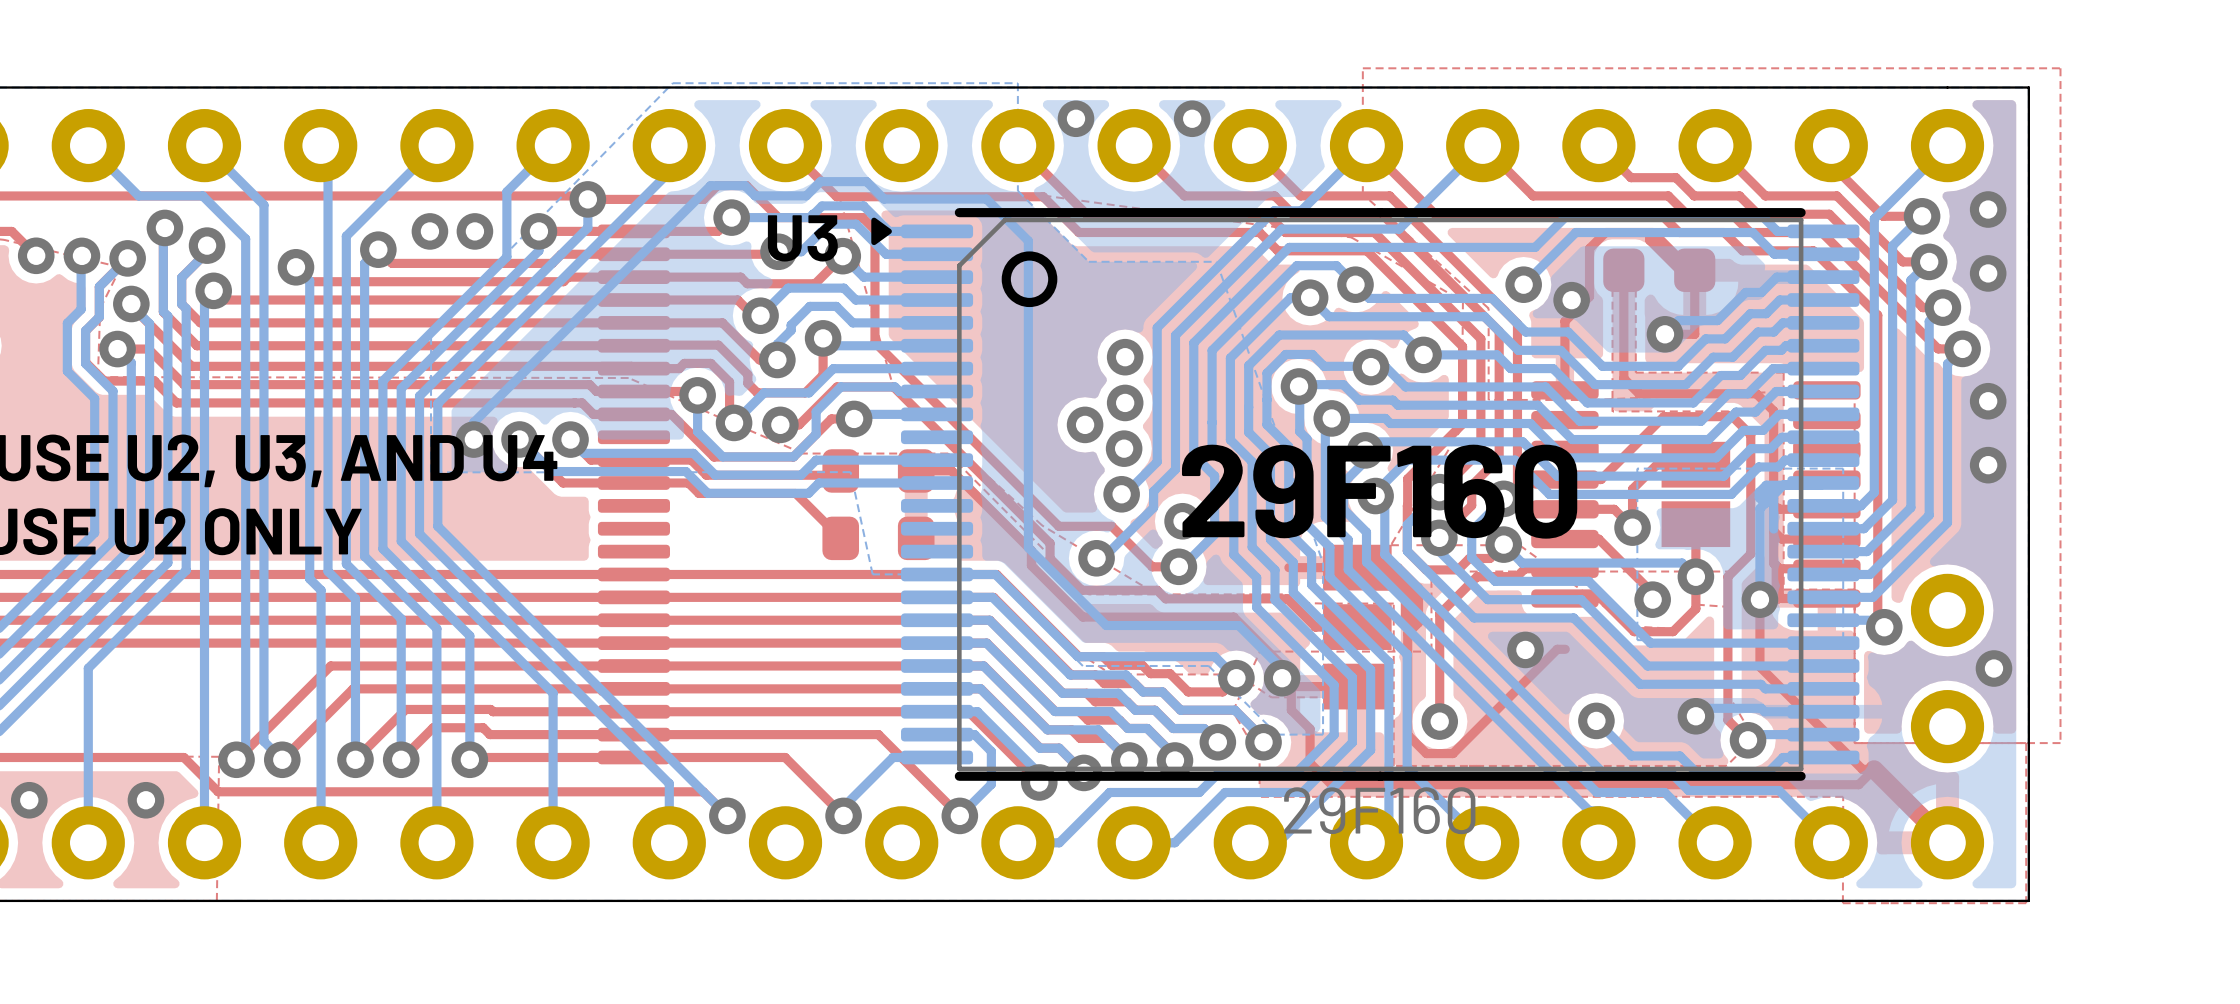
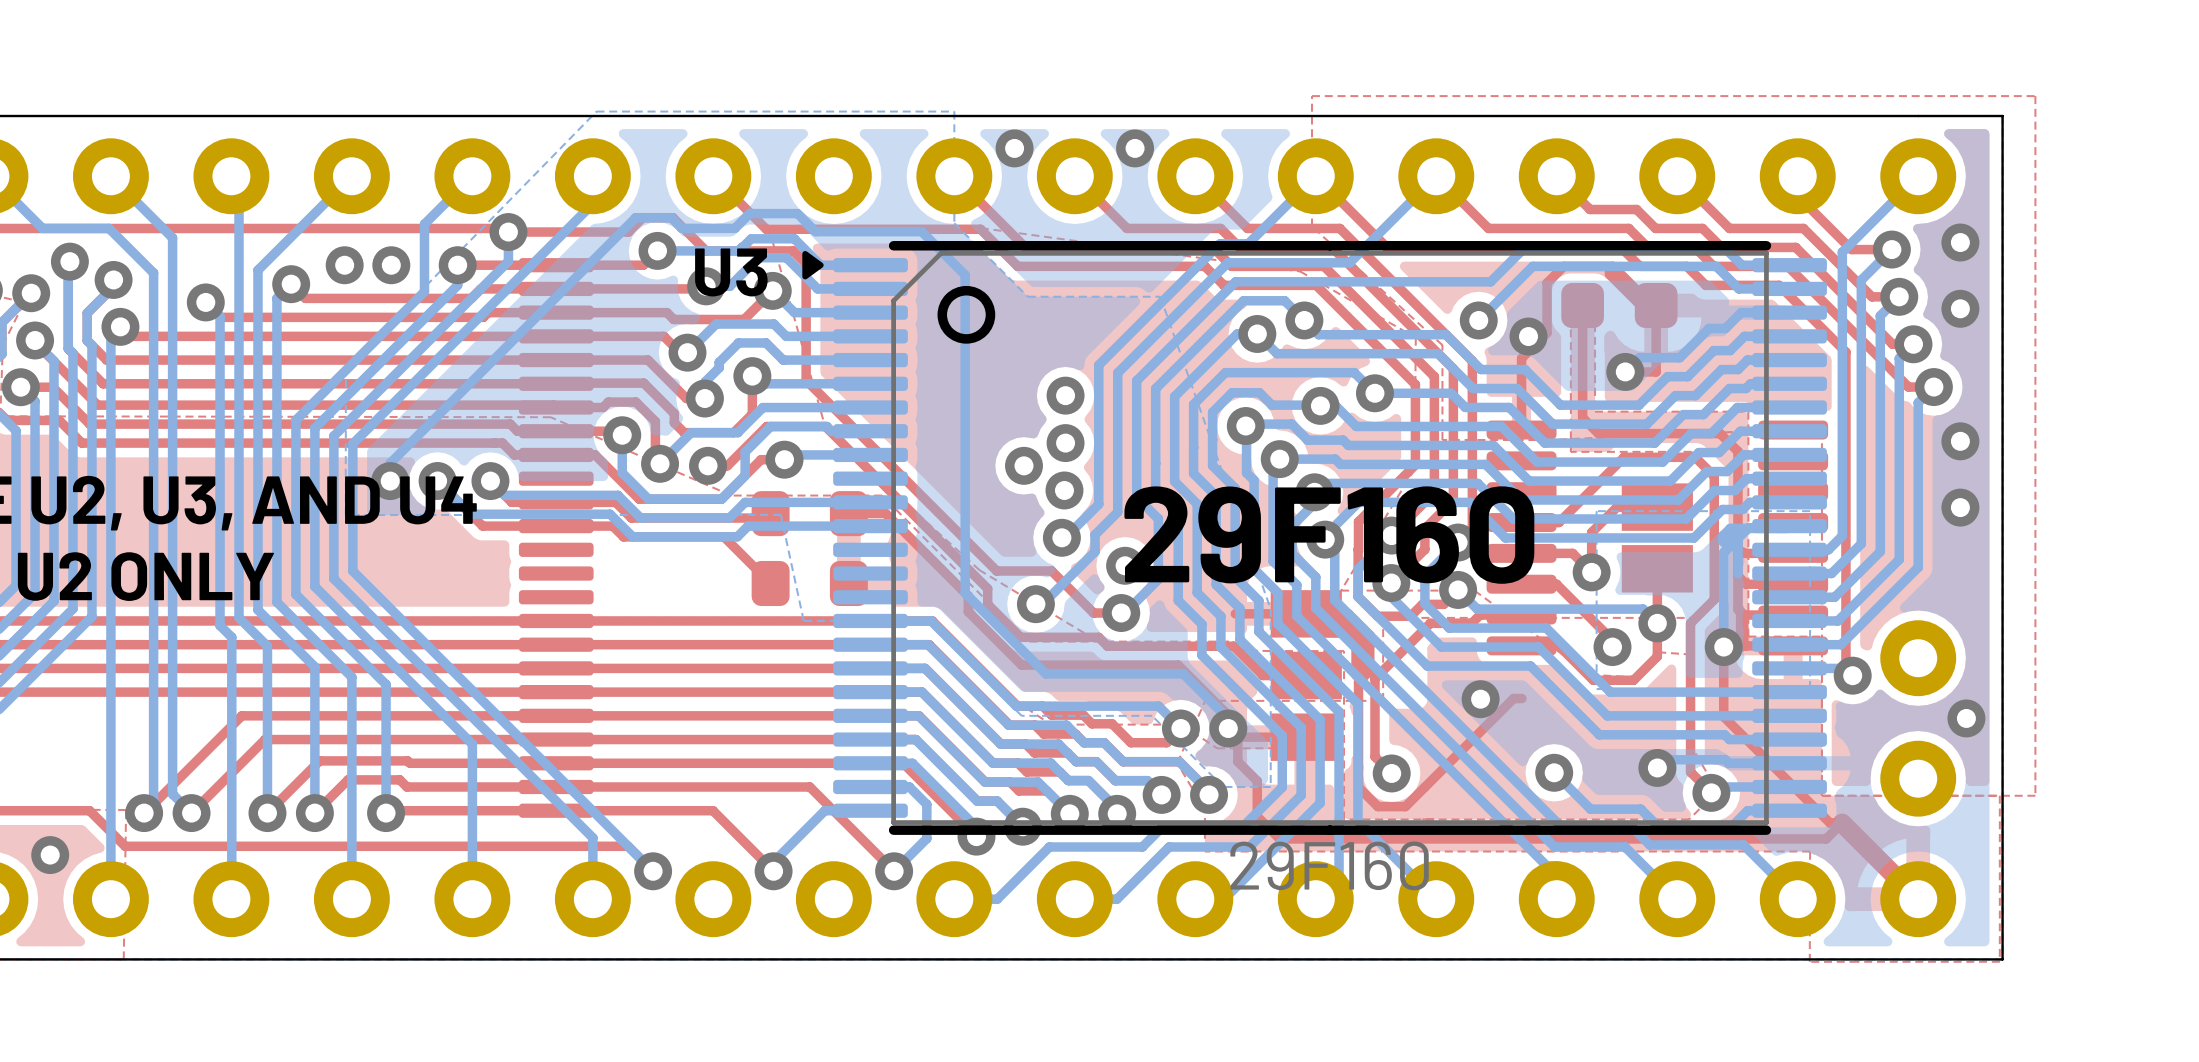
top track: (1439, 614) (1439, 721) -> (1391, 661) (1374, 678) (1374, 756) (1391, 773)

